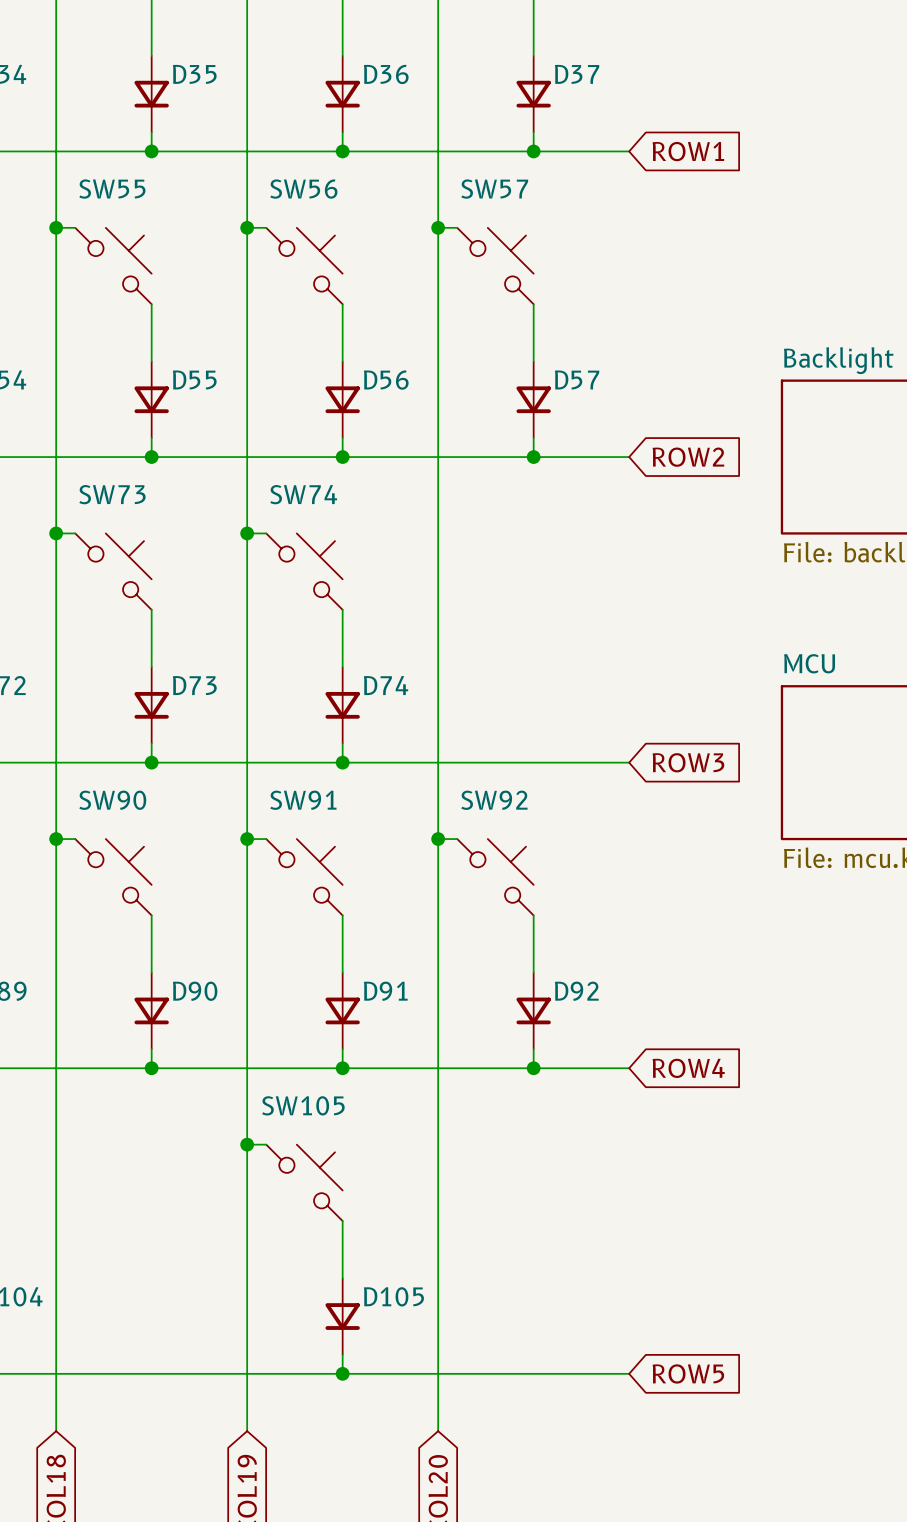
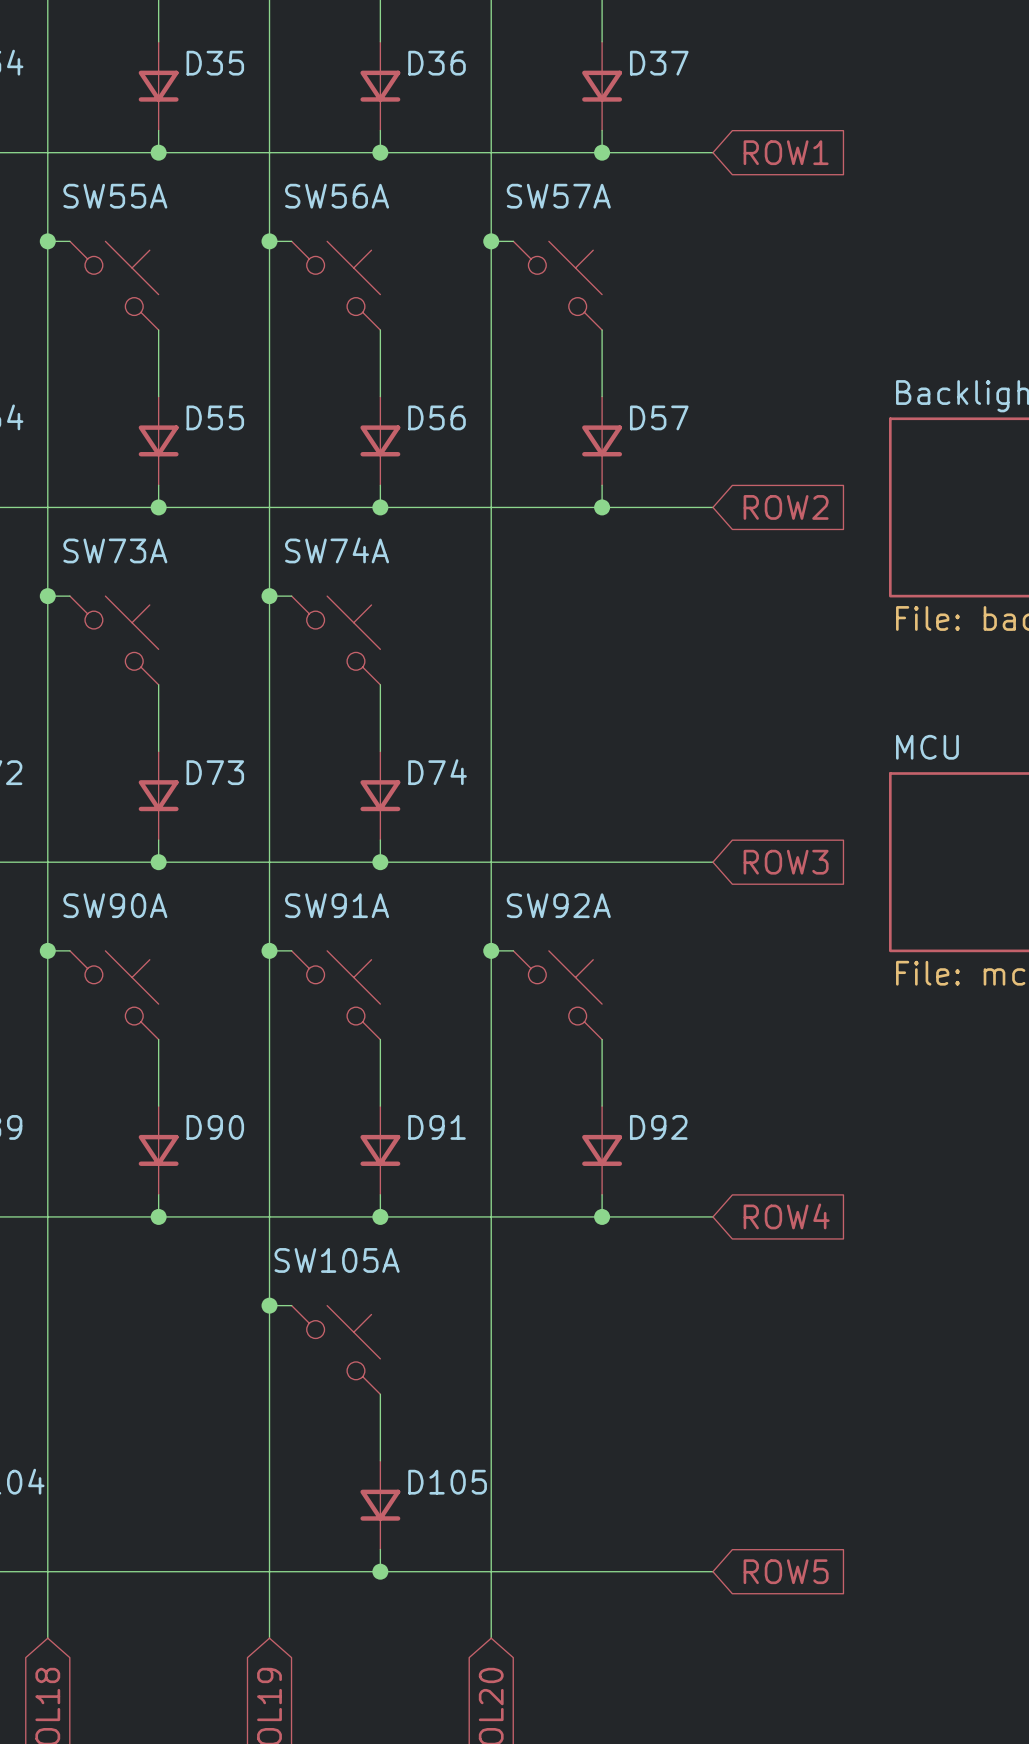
SW55 name: SW55 (112, 189) -> SW55A (115, 196)
SW56 name: SW56 (303, 189) -> SW56A (337, 196)
SW57 name: SW57 (494, 189) -> SW57A (558, 196)
SW73 name: SW73 (112, 494) -> SW73A (115, 550)
SW74 name: SW74 (303, 494) -> SW74A (337, 550)
SW90 name: SW90 (112, 800) -> SW90A (115, 905)
SW91 name: SW91 (303, 800) -> SW91A (337, 905)
SW92 name: SW92 (494, 800) -> SW92A (558, 905)
SW105 name: SW105 (303, 1105) -> SW105A (337, 1260)

